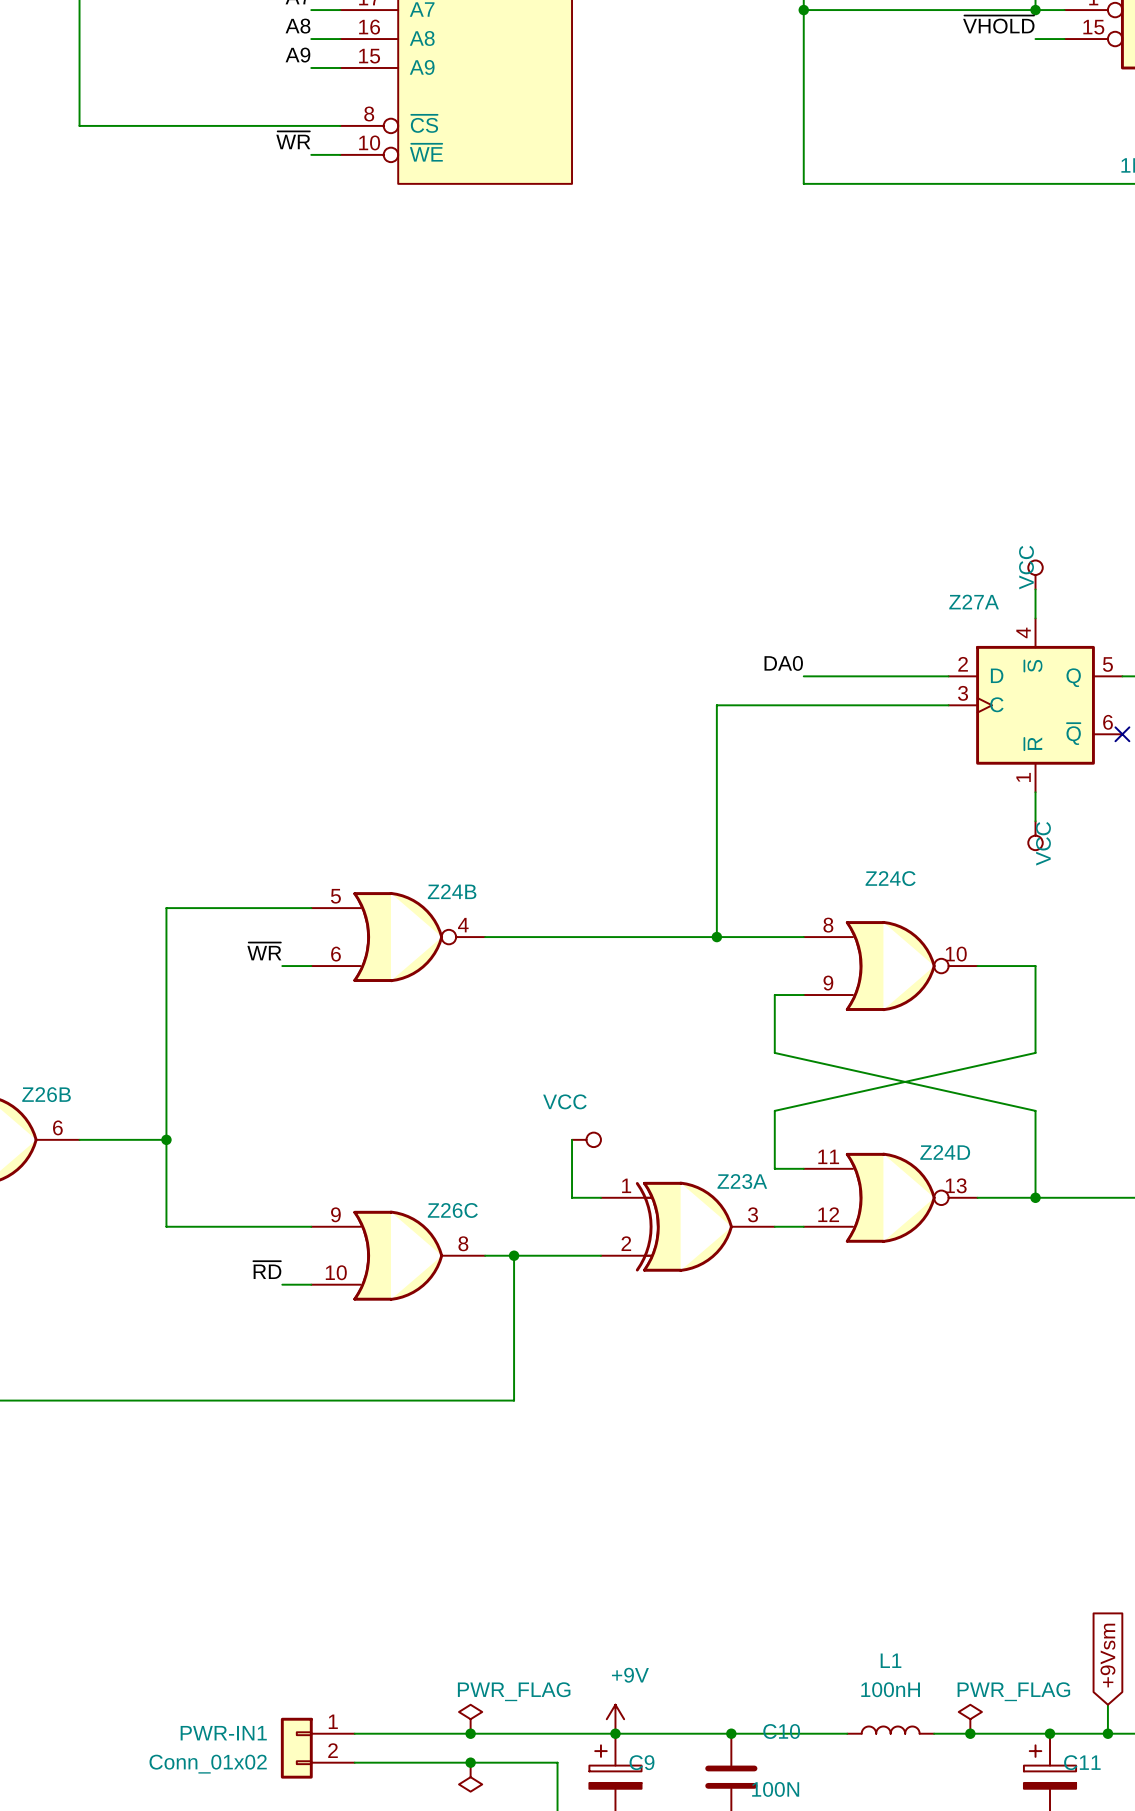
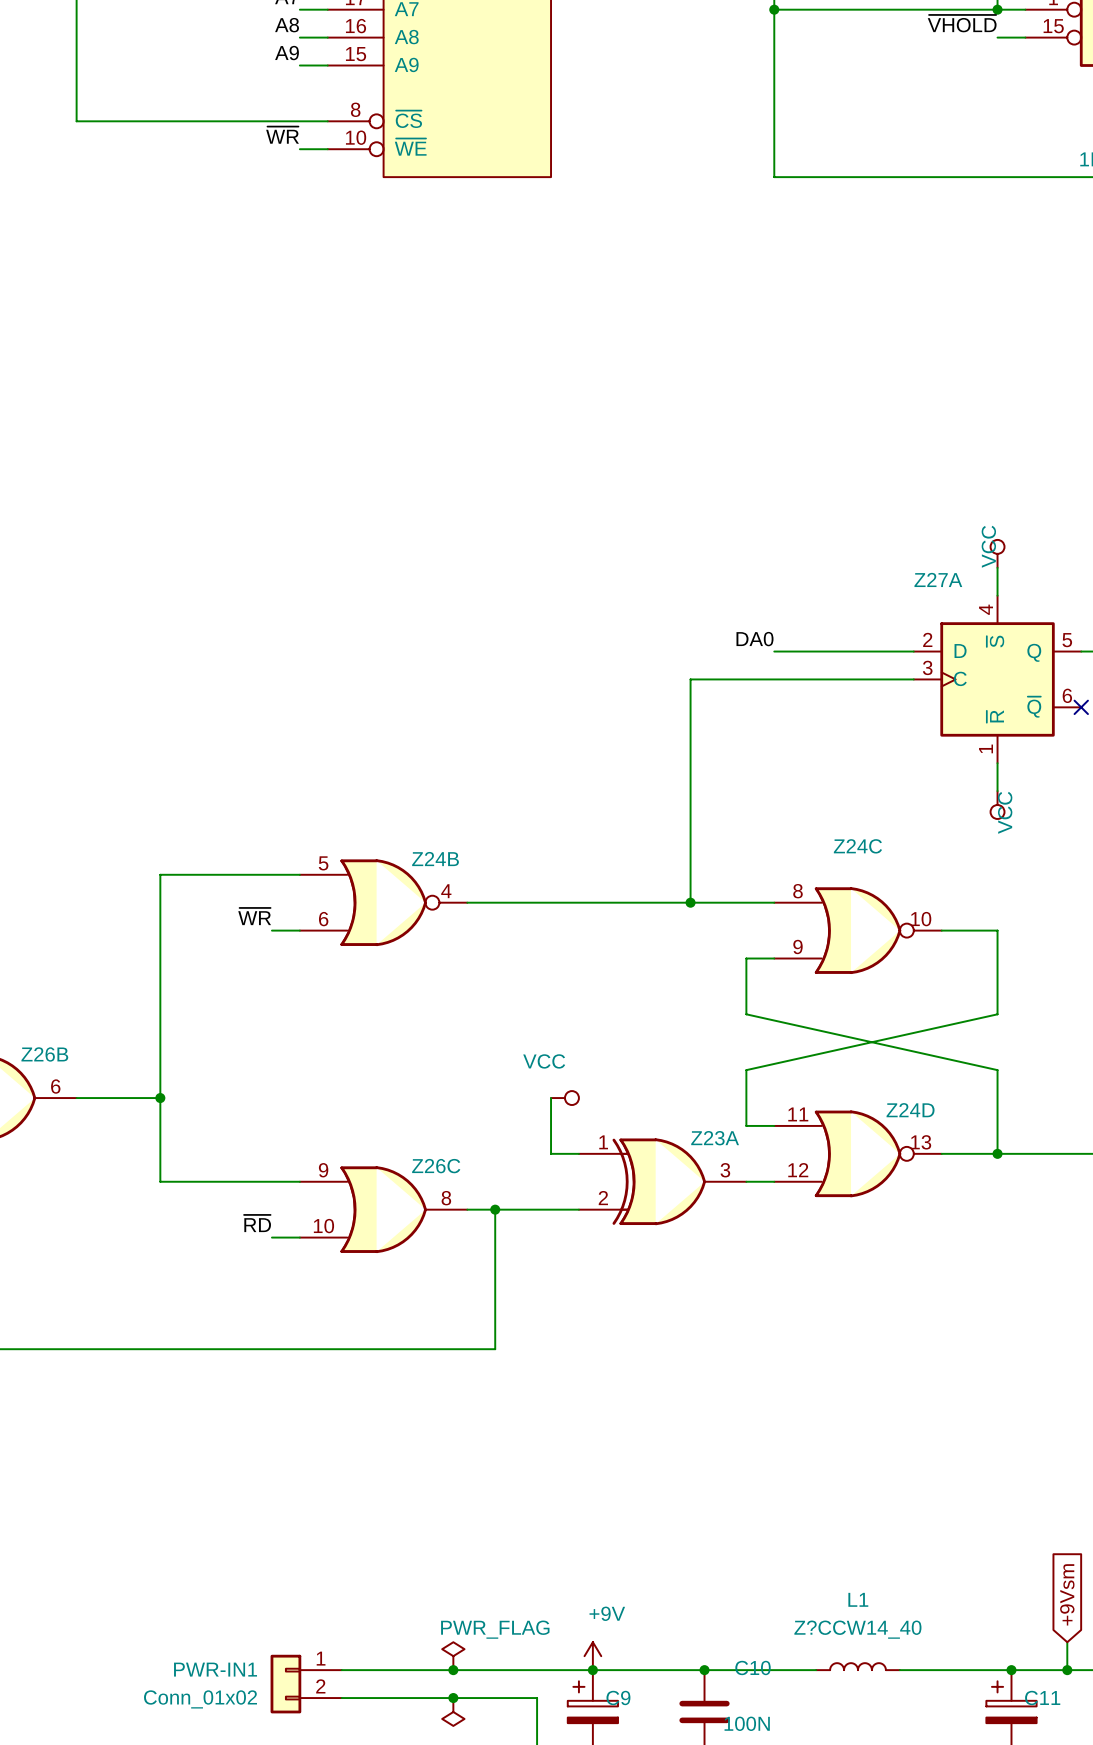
L1 value: 100nH (890, 1689) -> Z?CCW14_40 (857, 1629)
power symbol: PWR_FLAG (970, 1719) -> none
junction: (970, 1733) -> none

